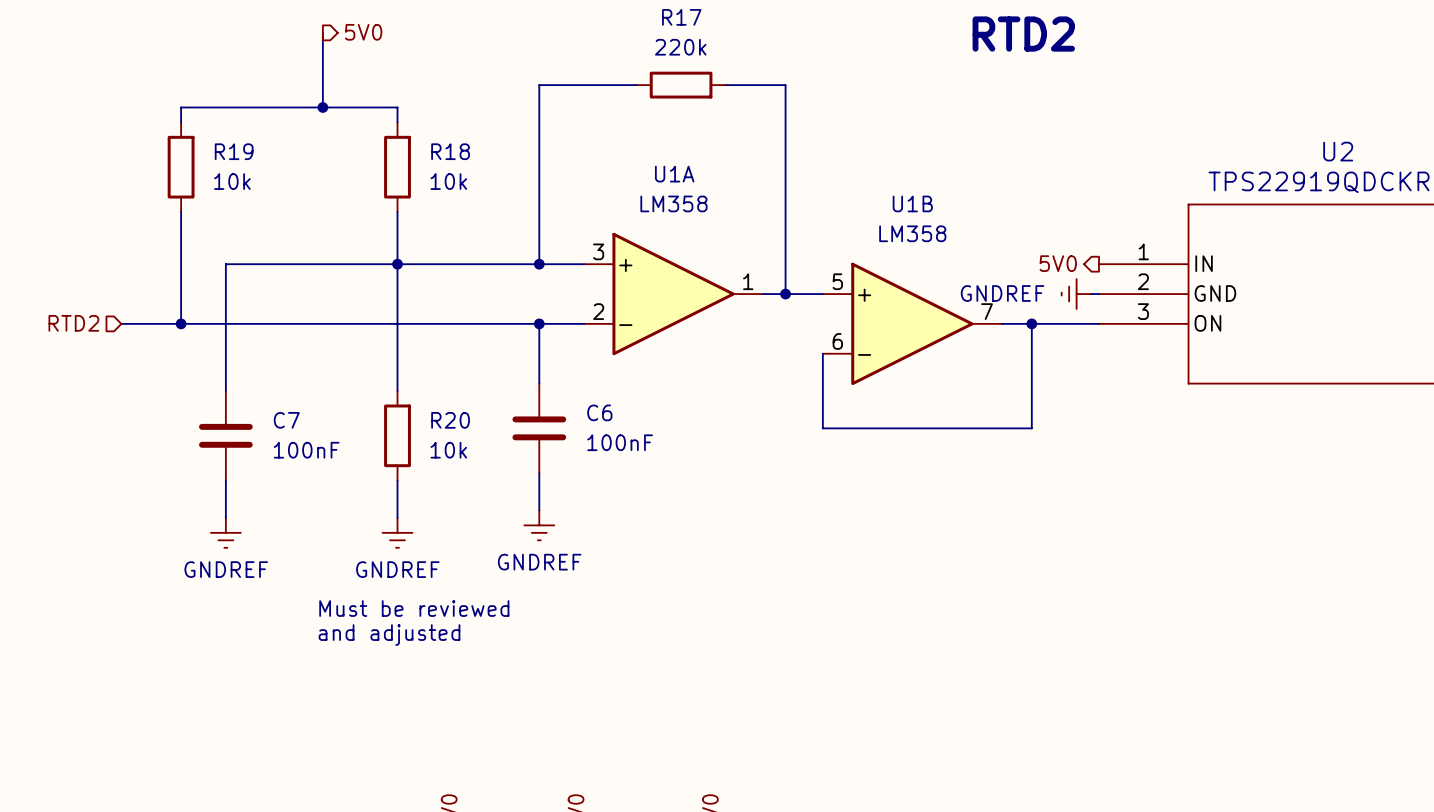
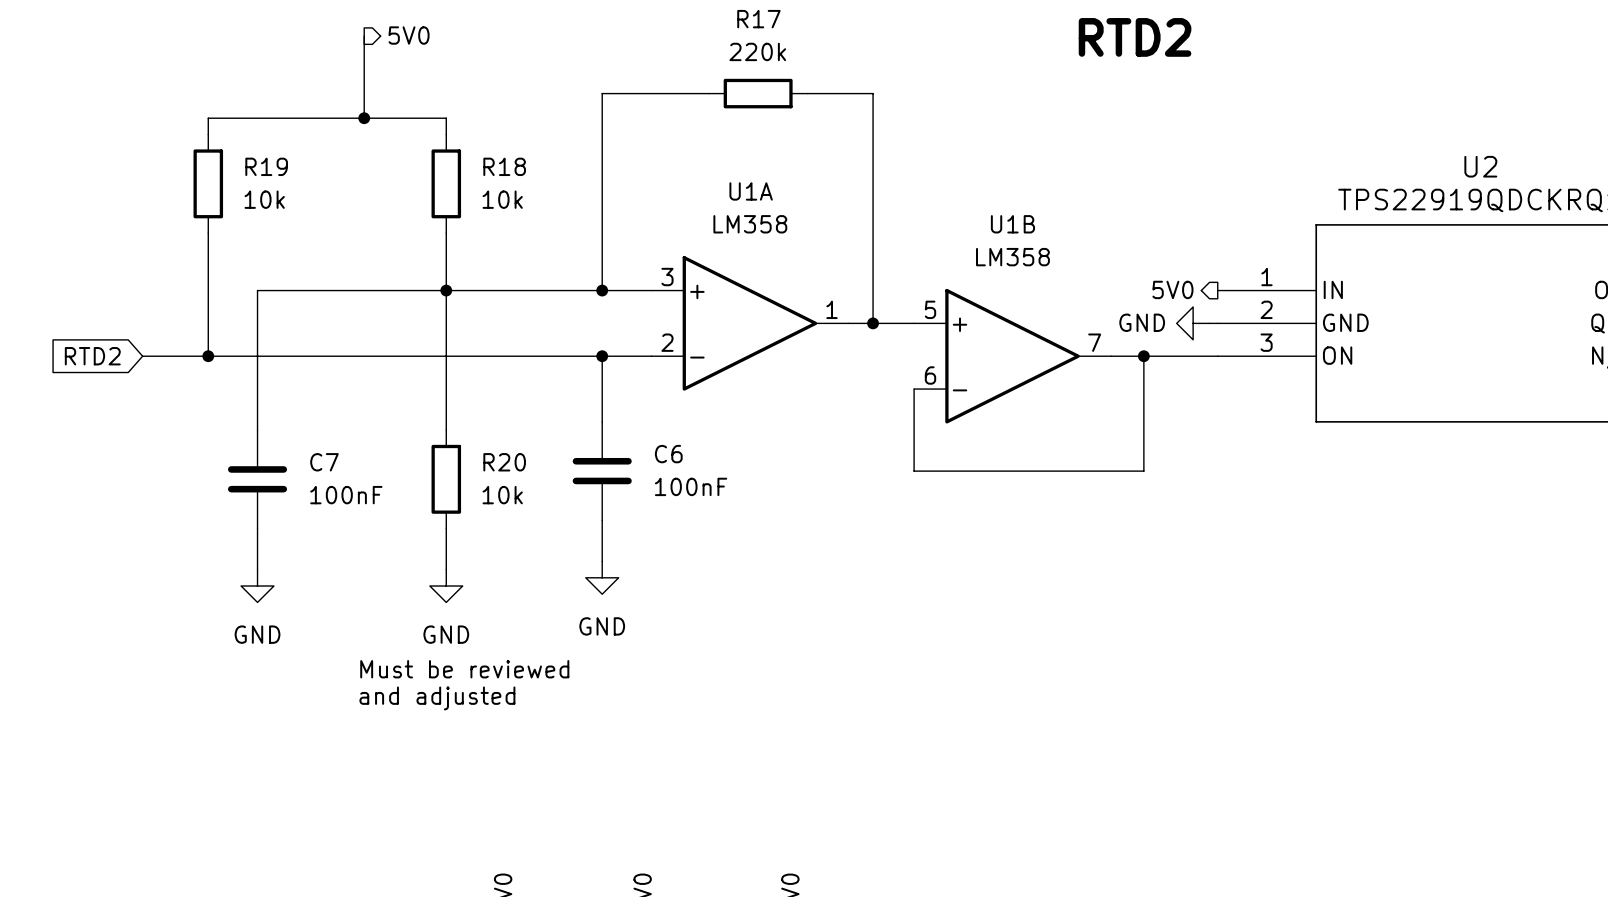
power symbol: GNDREF (1076, 294) -> GND (1193, 323)
hierarchical label: RTD2 (73, 323) -> none
global label: none -> RTD2 (92, 356)
power symbol: GNDREF (539, 525) -> GND (602, 577)
power symbol: GNDREF (225, 532) -> GND (257, 586)
power symbol: GNDREF (397, 532) -> GND (446, 586)

